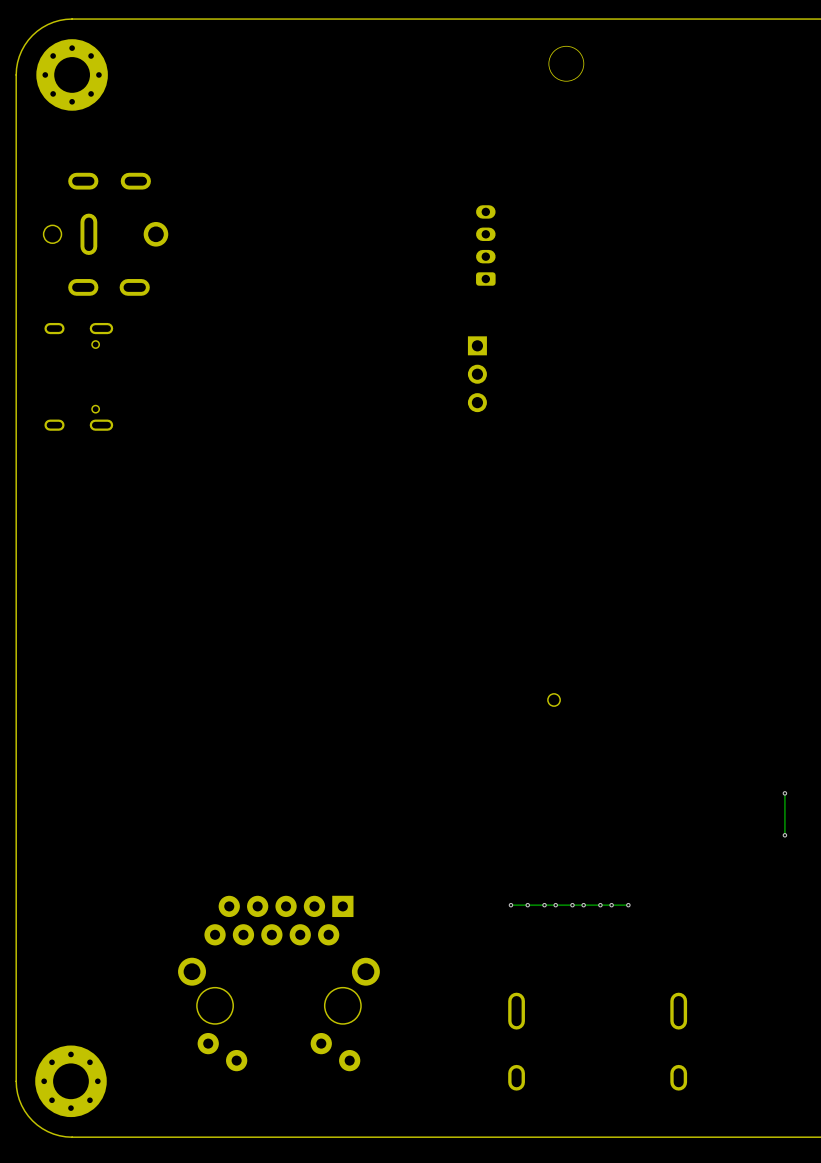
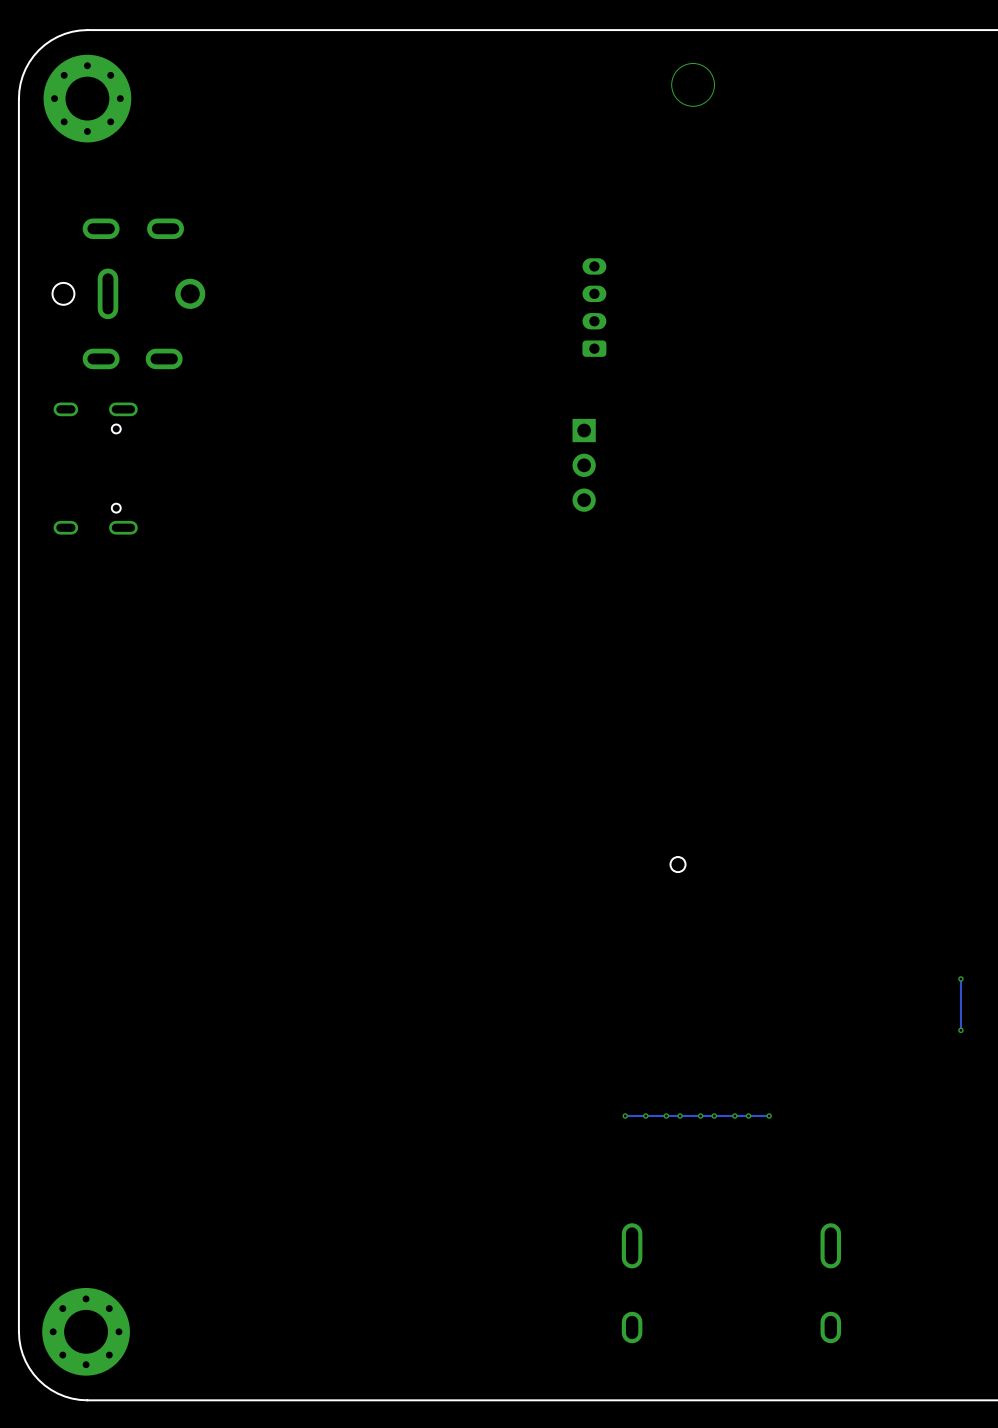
part: (278, 983) -> none

